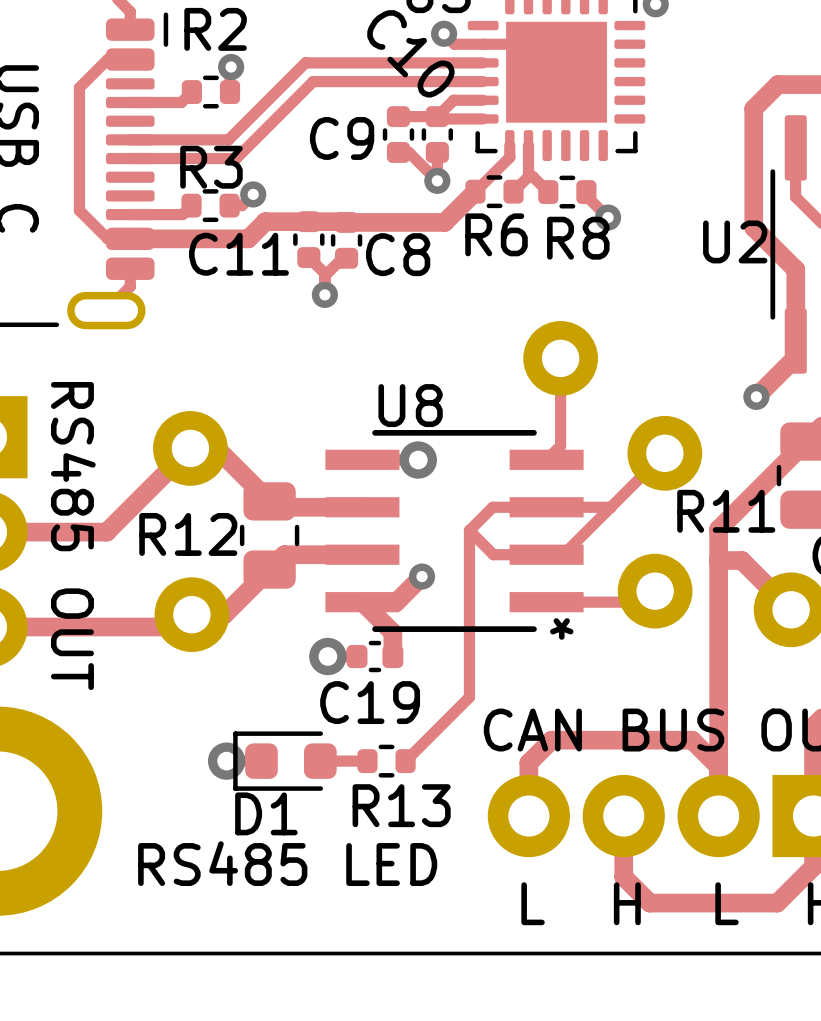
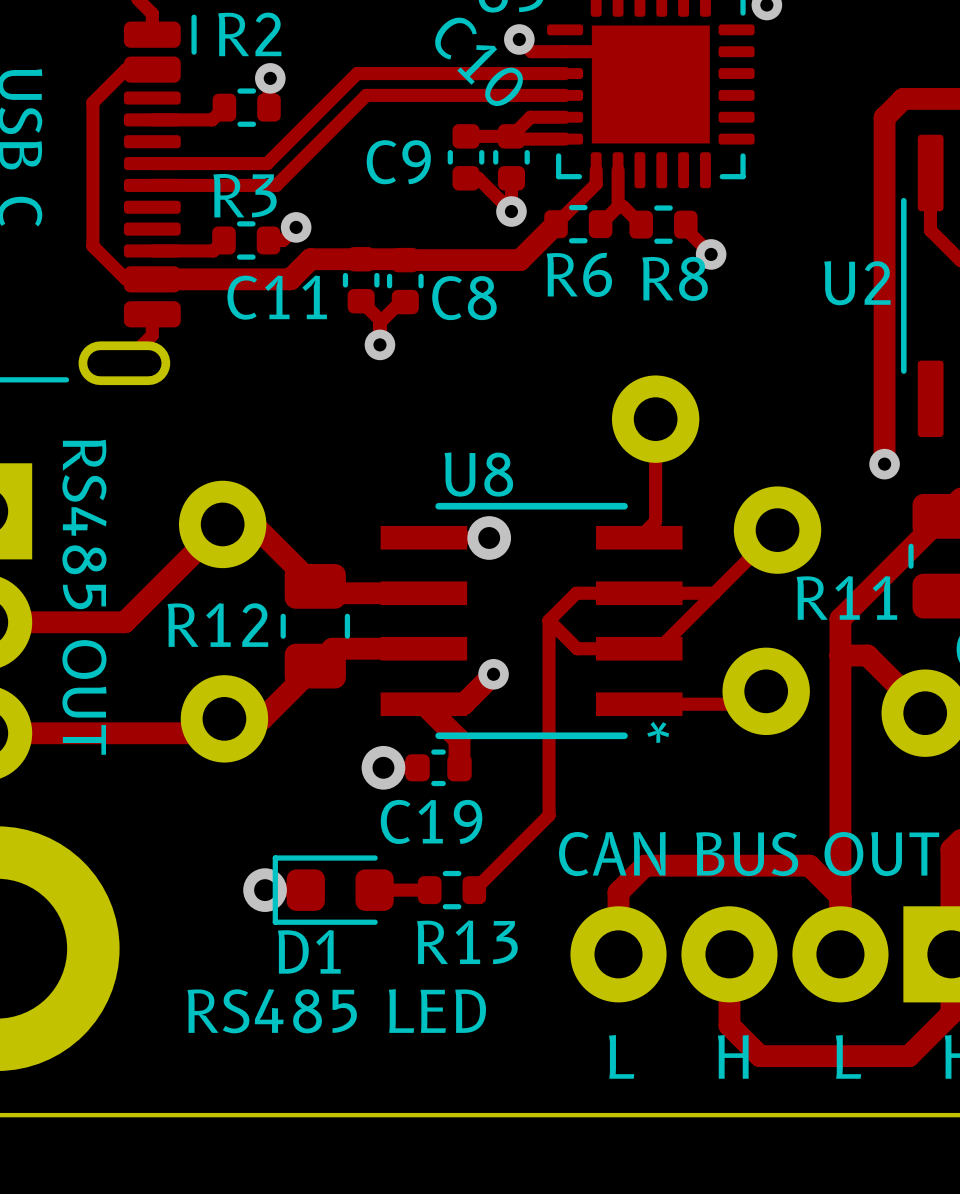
track: (778, 84) (753, 108) (753, 227) (795, 269) (795, 357) (756, 396) -> (909, 98) (903, 98) (884, 117) (884, 464)

